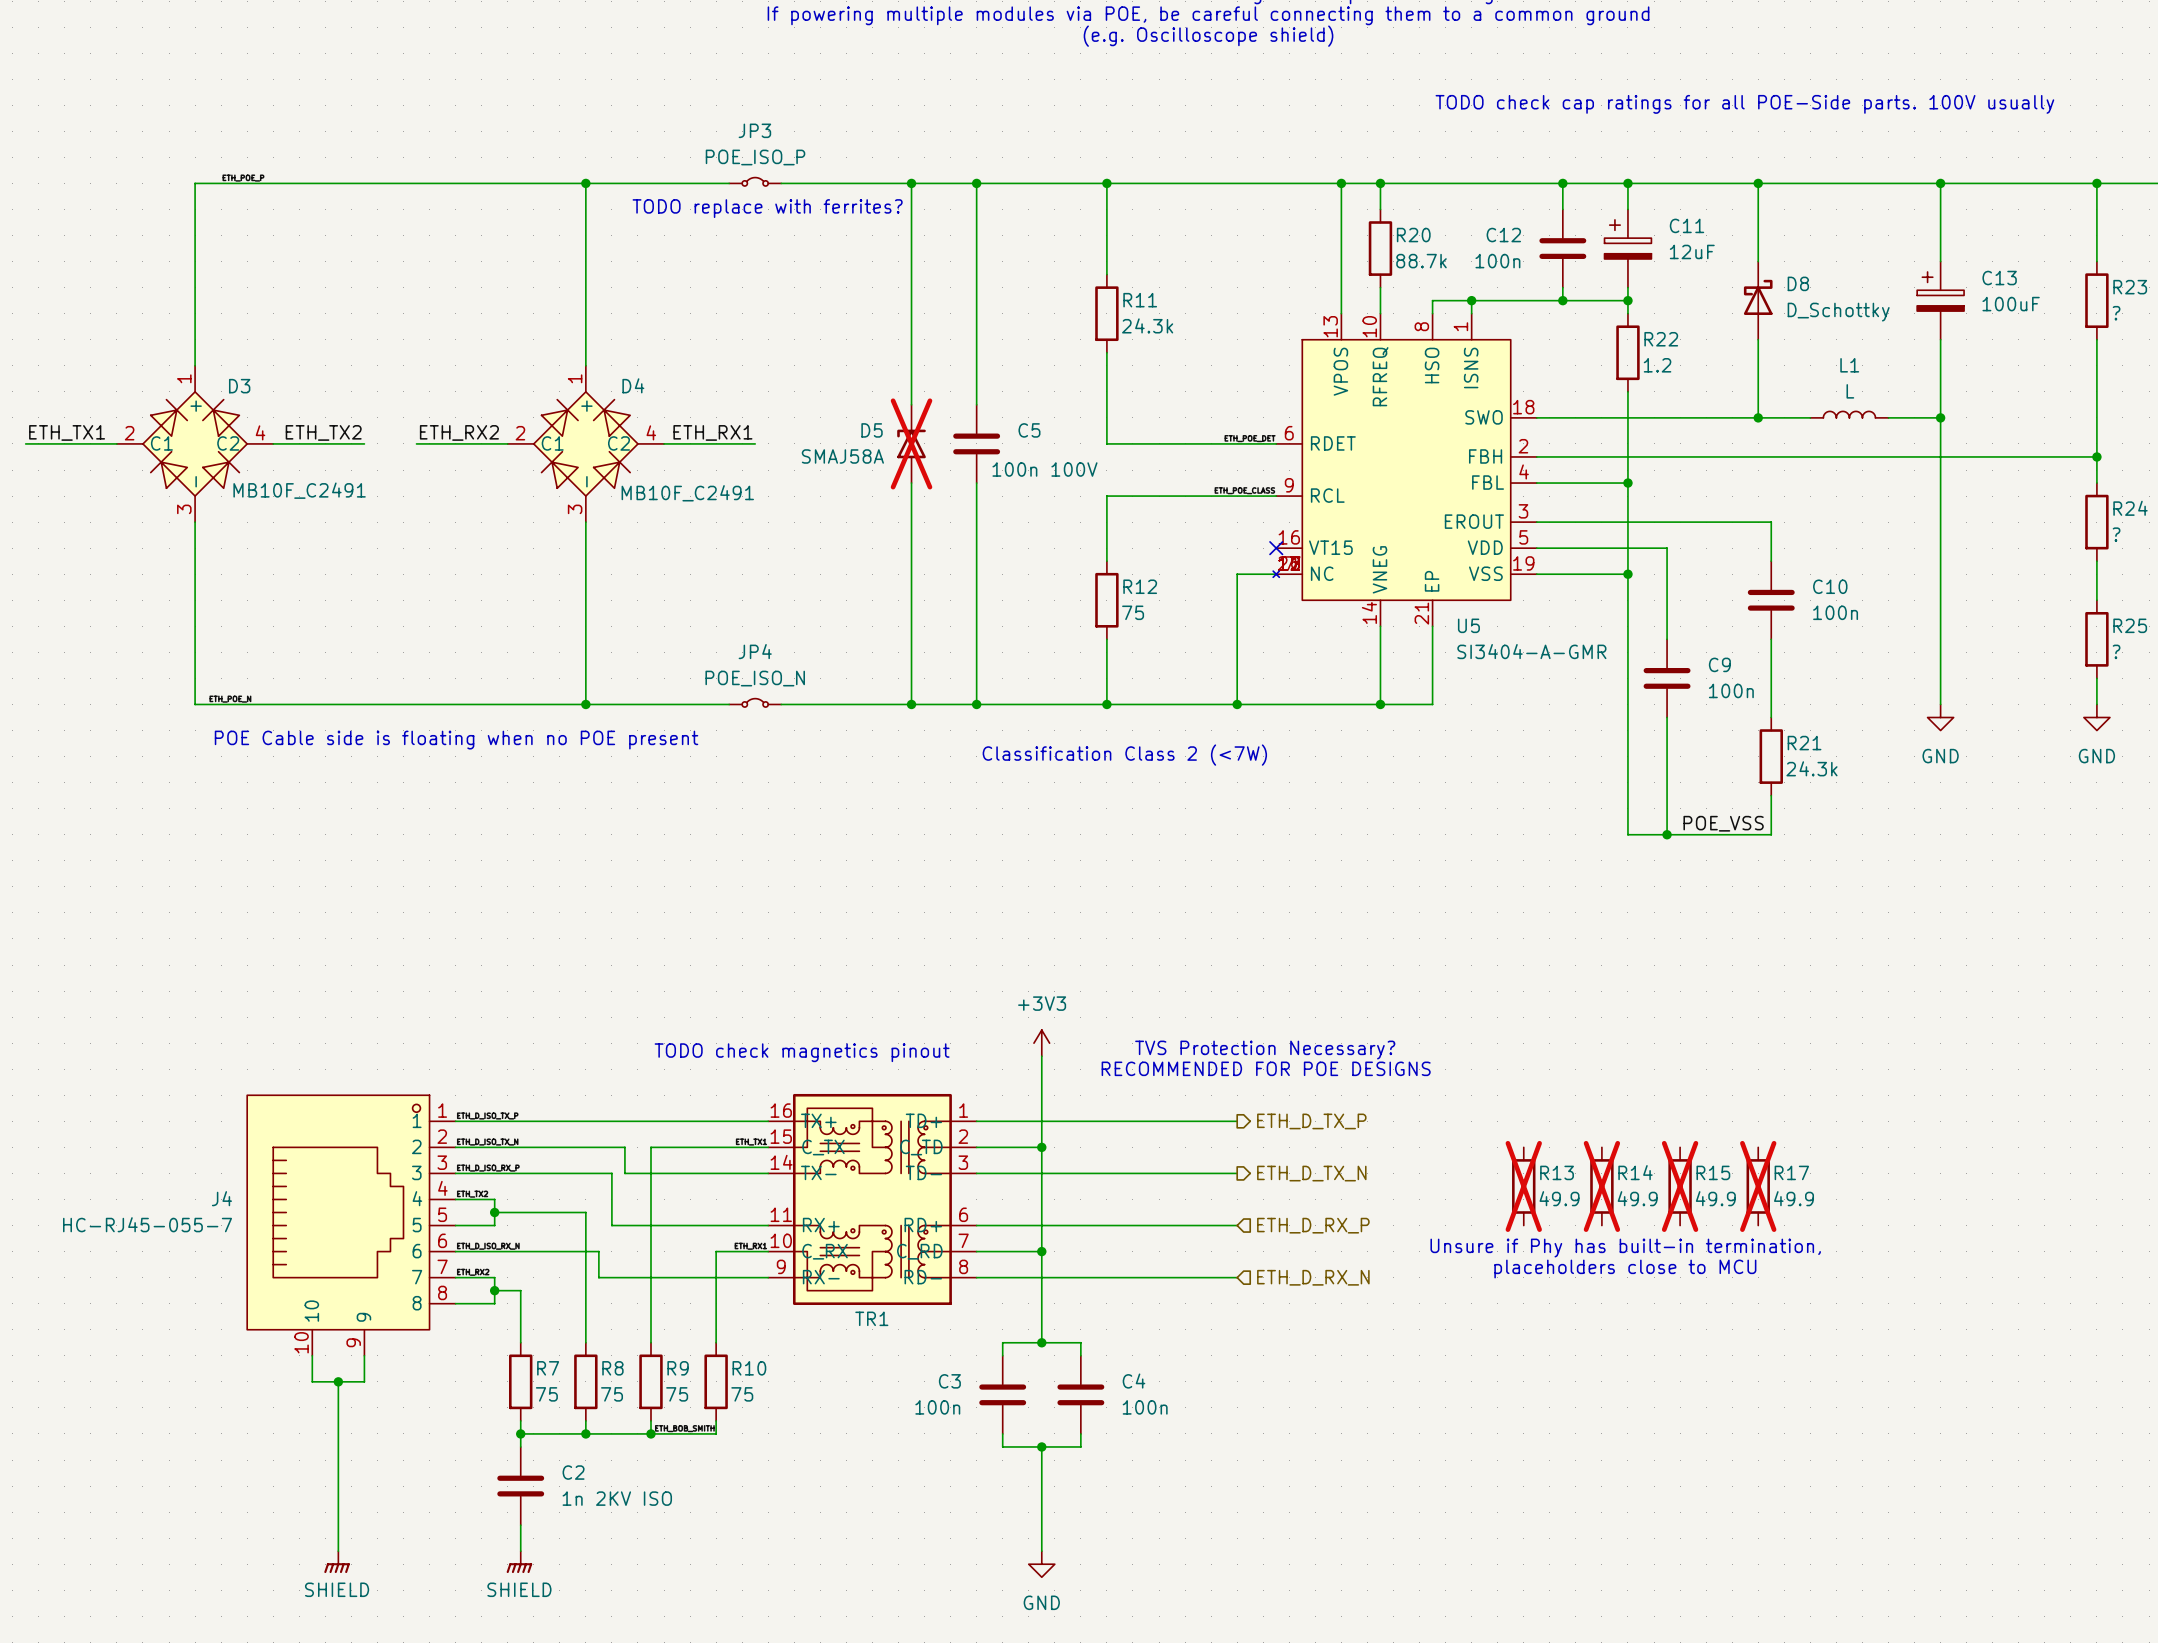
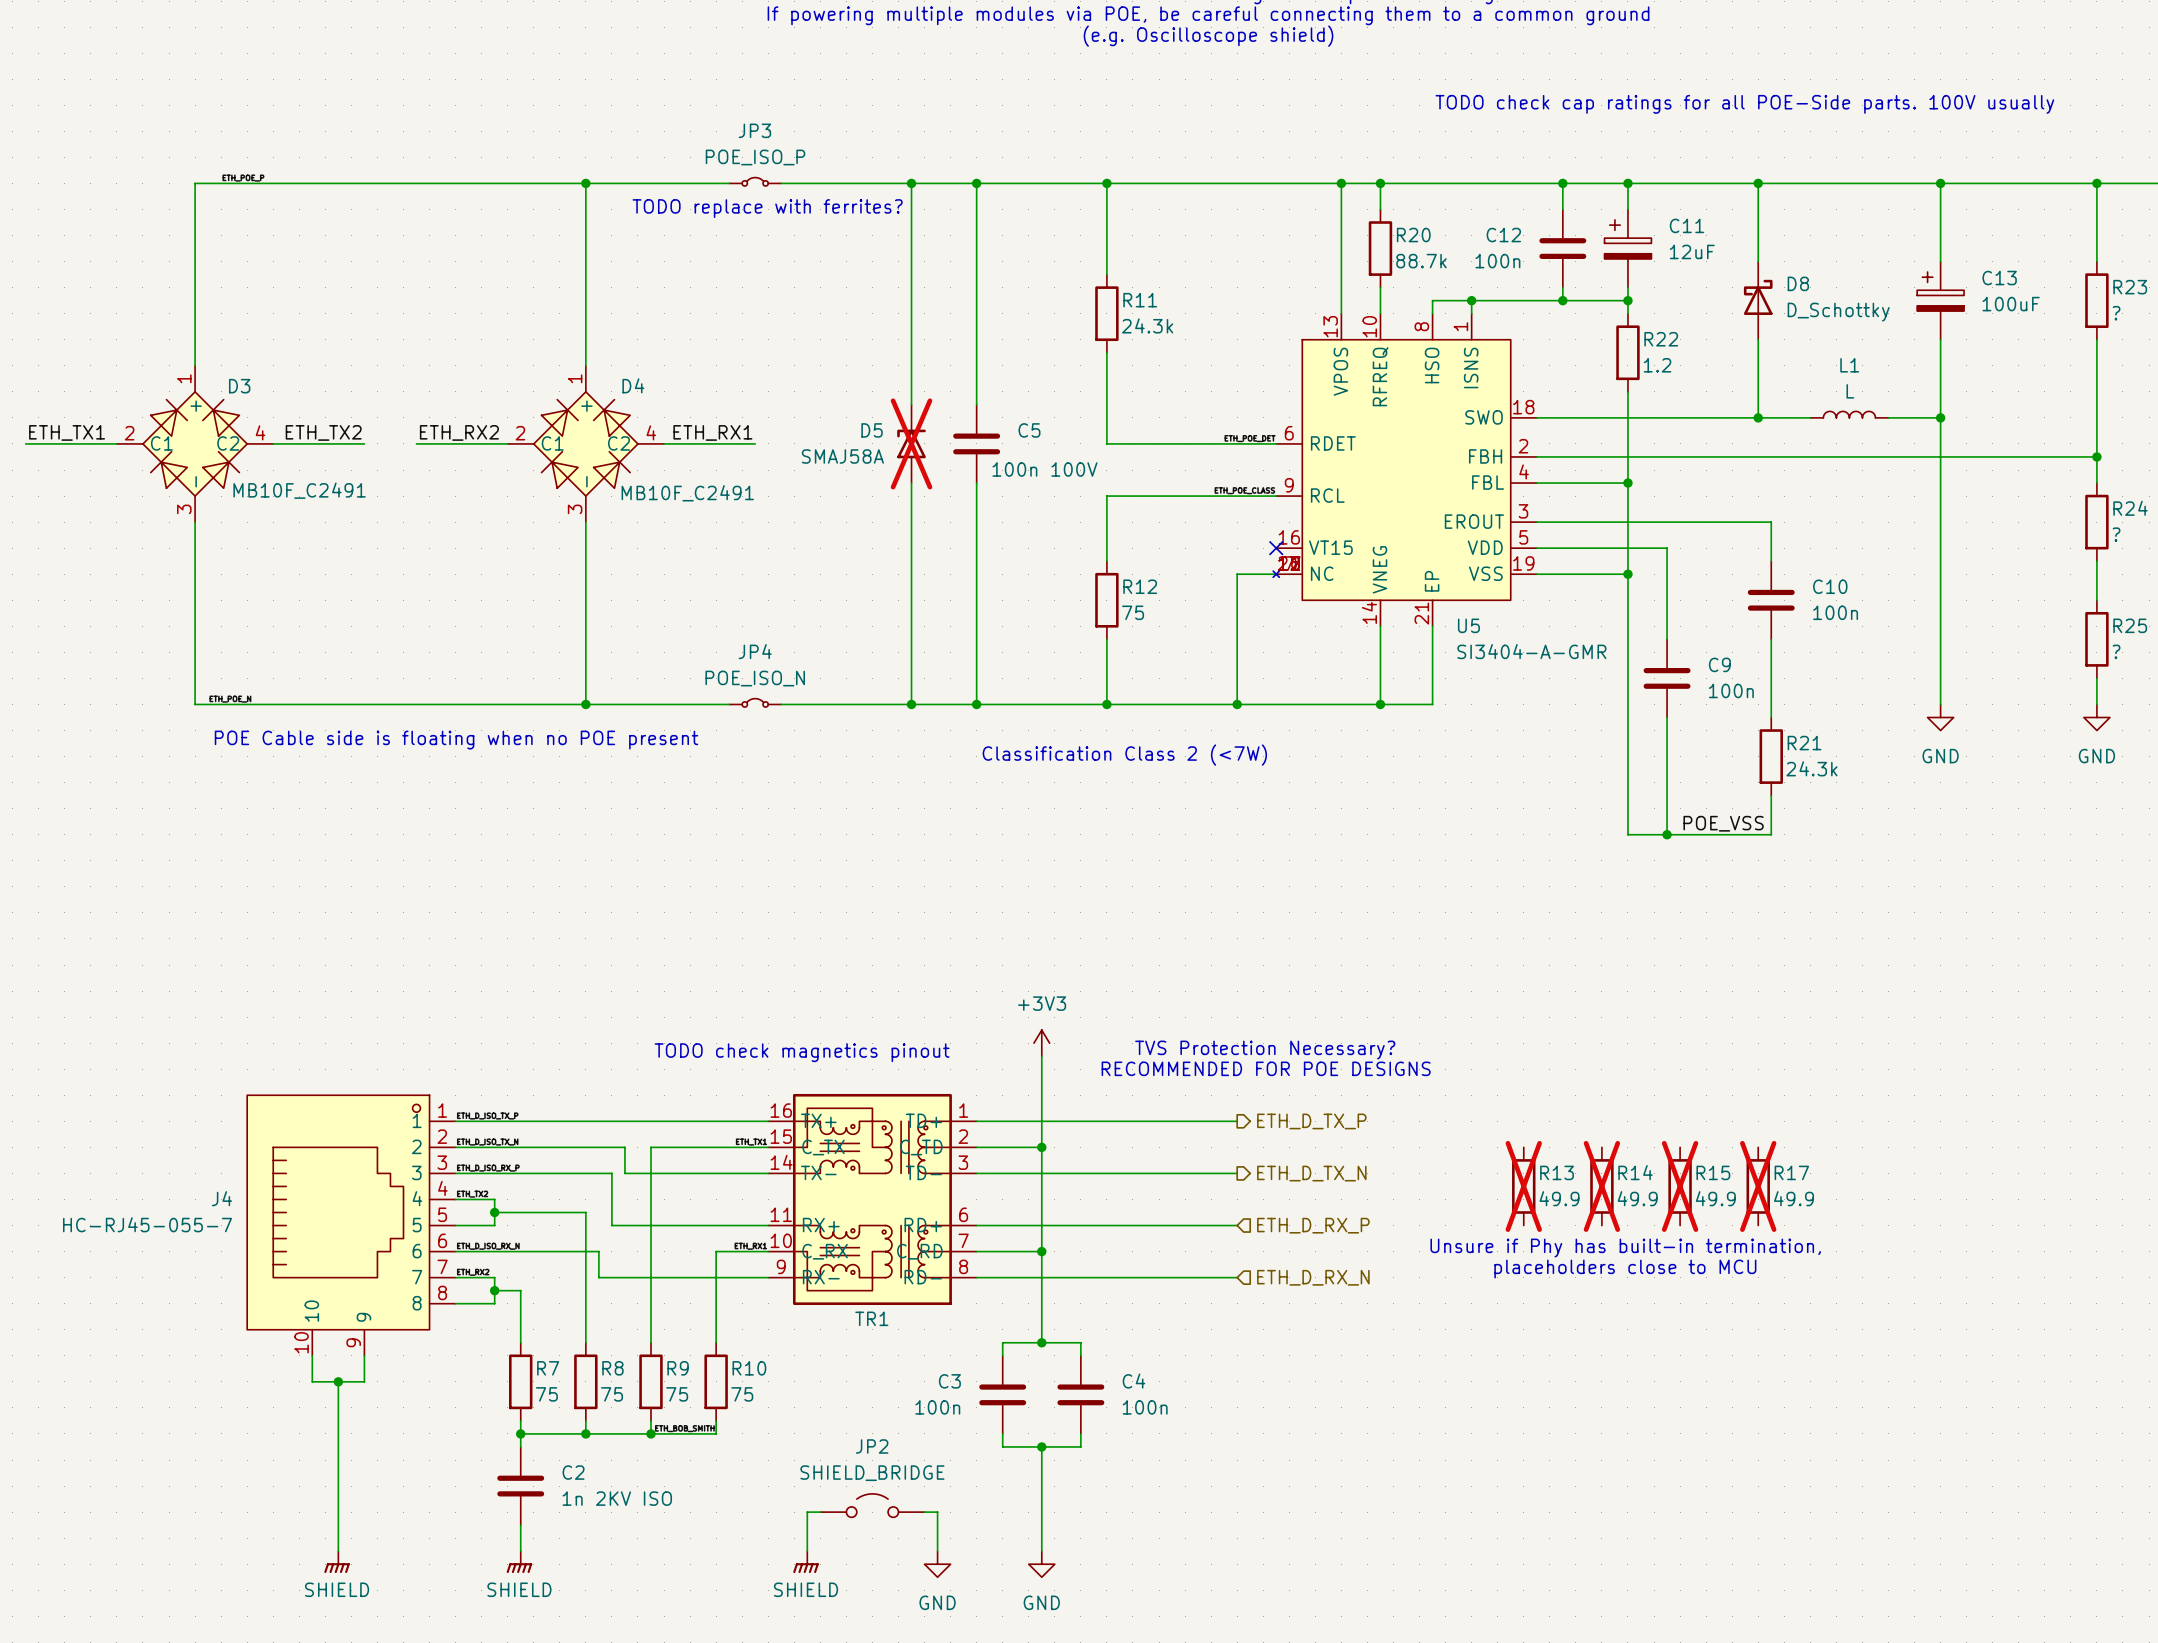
JP2: none -> SHIELD_BRIDGE (872, 1505)
wire: none -> (820, 1512) (807, 1512) (807, 1551)
wire: none -> (924, 1512) (937, 1512) (937, 1551)
power symbol: none -> SHIELD (806, 1562)
power symbol: none -> GND (937, 1564)

